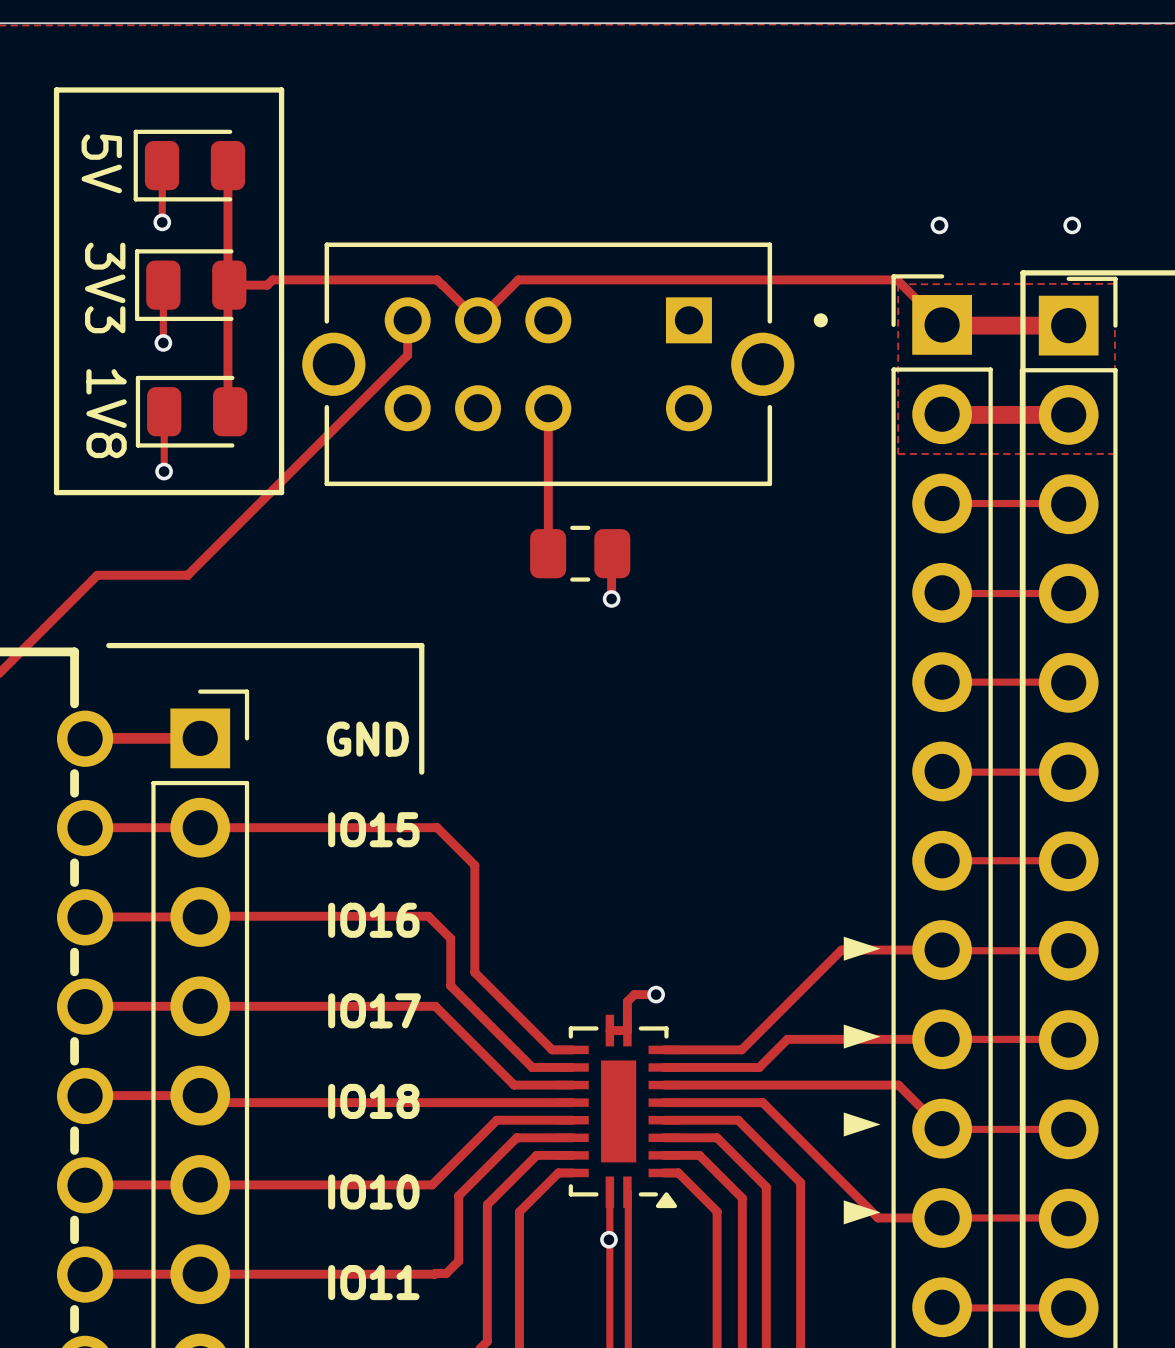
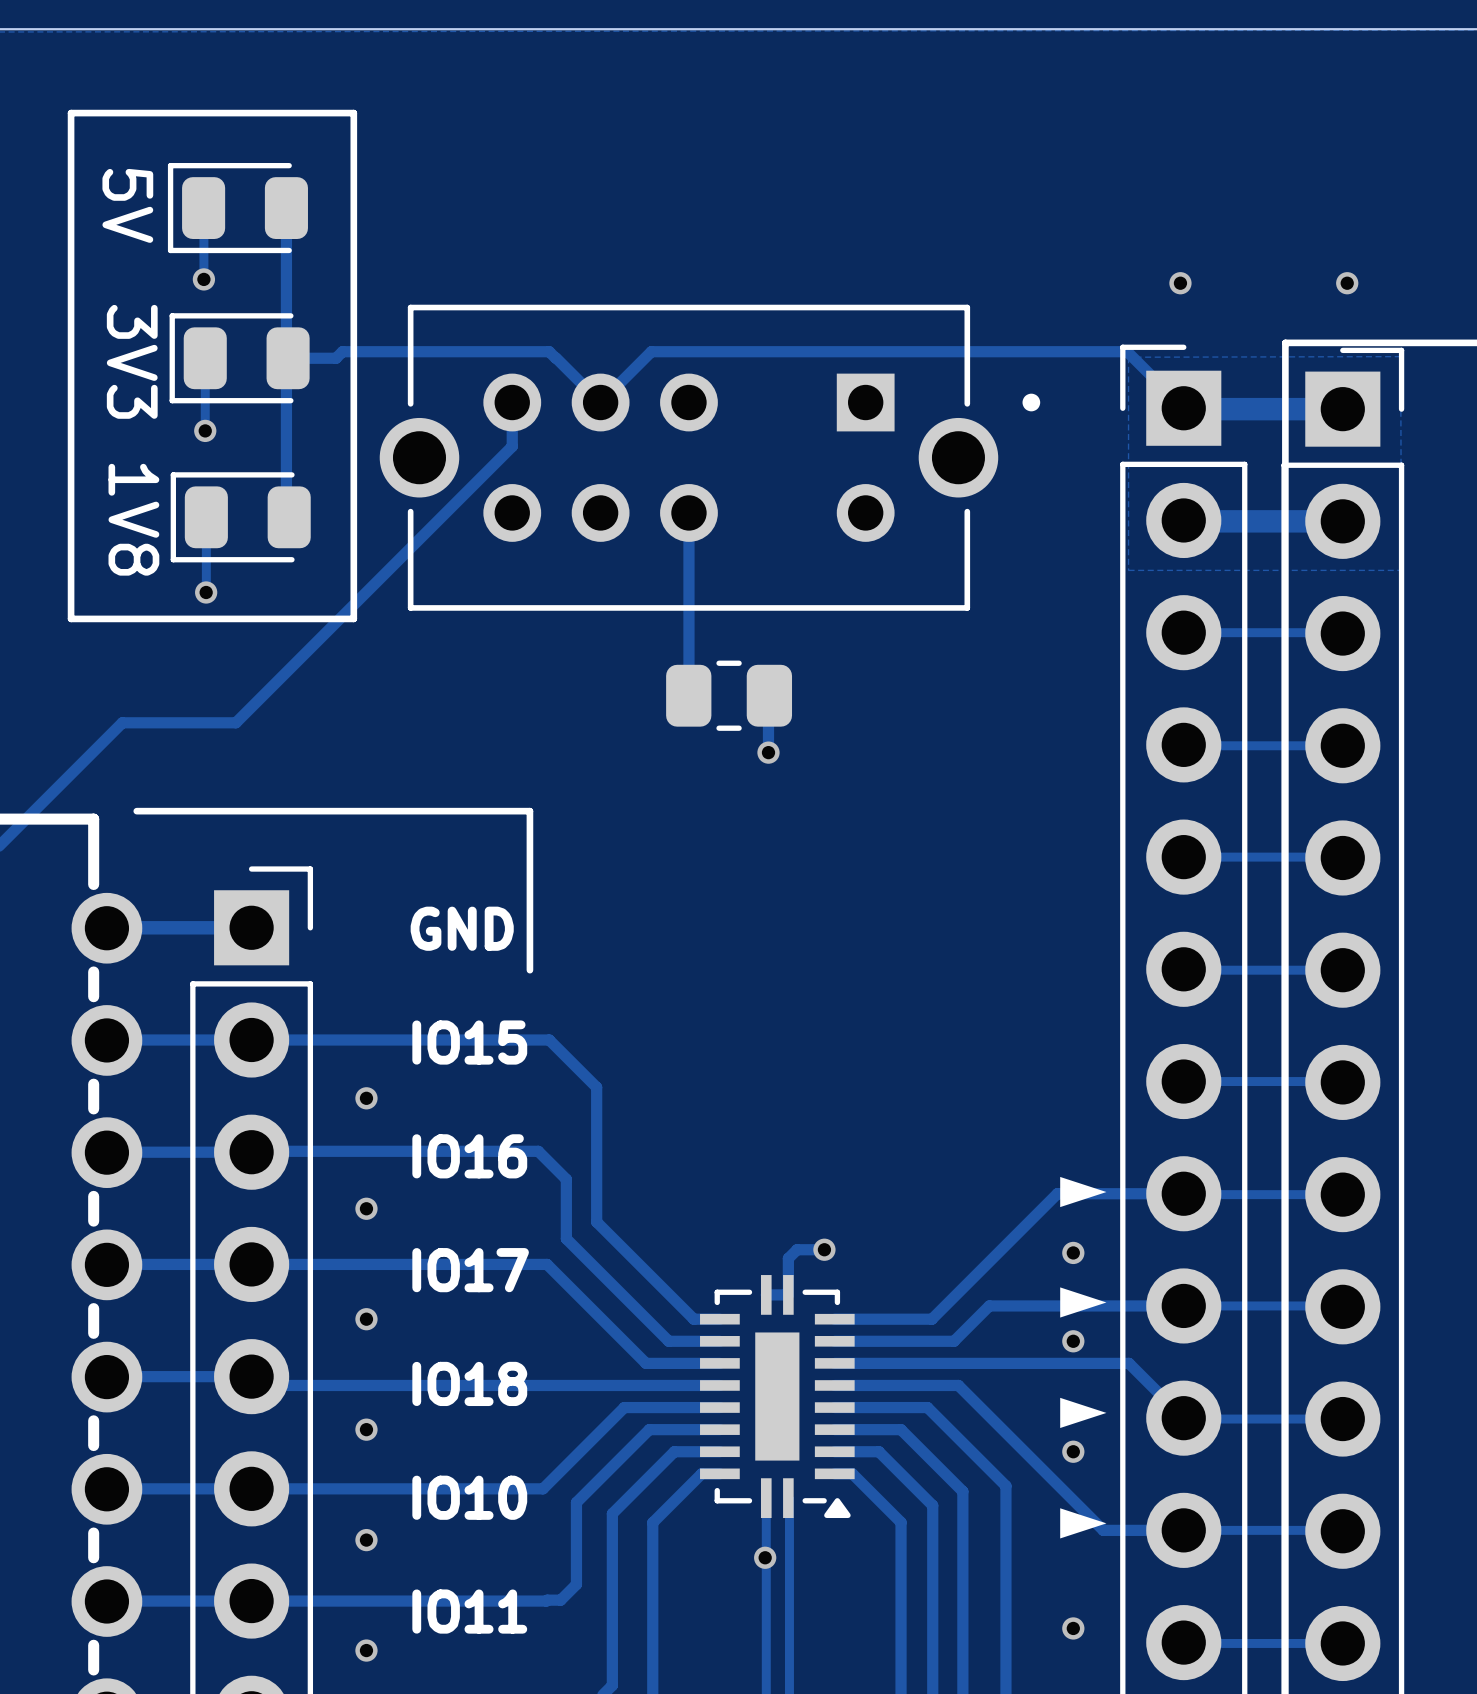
via: none -> (366, 1098)
via: none -> (366, 1208)
via: none -> (1073, 1252)
via: none -> (366, 1319)
via: none -> (1073, 1341)
via: none -> (366, 1429)
via: none -> (1073, 1451)
via: none -> (366, 1540)
via: none -> (1073, 1628)
via: none -> (366, 1650)

